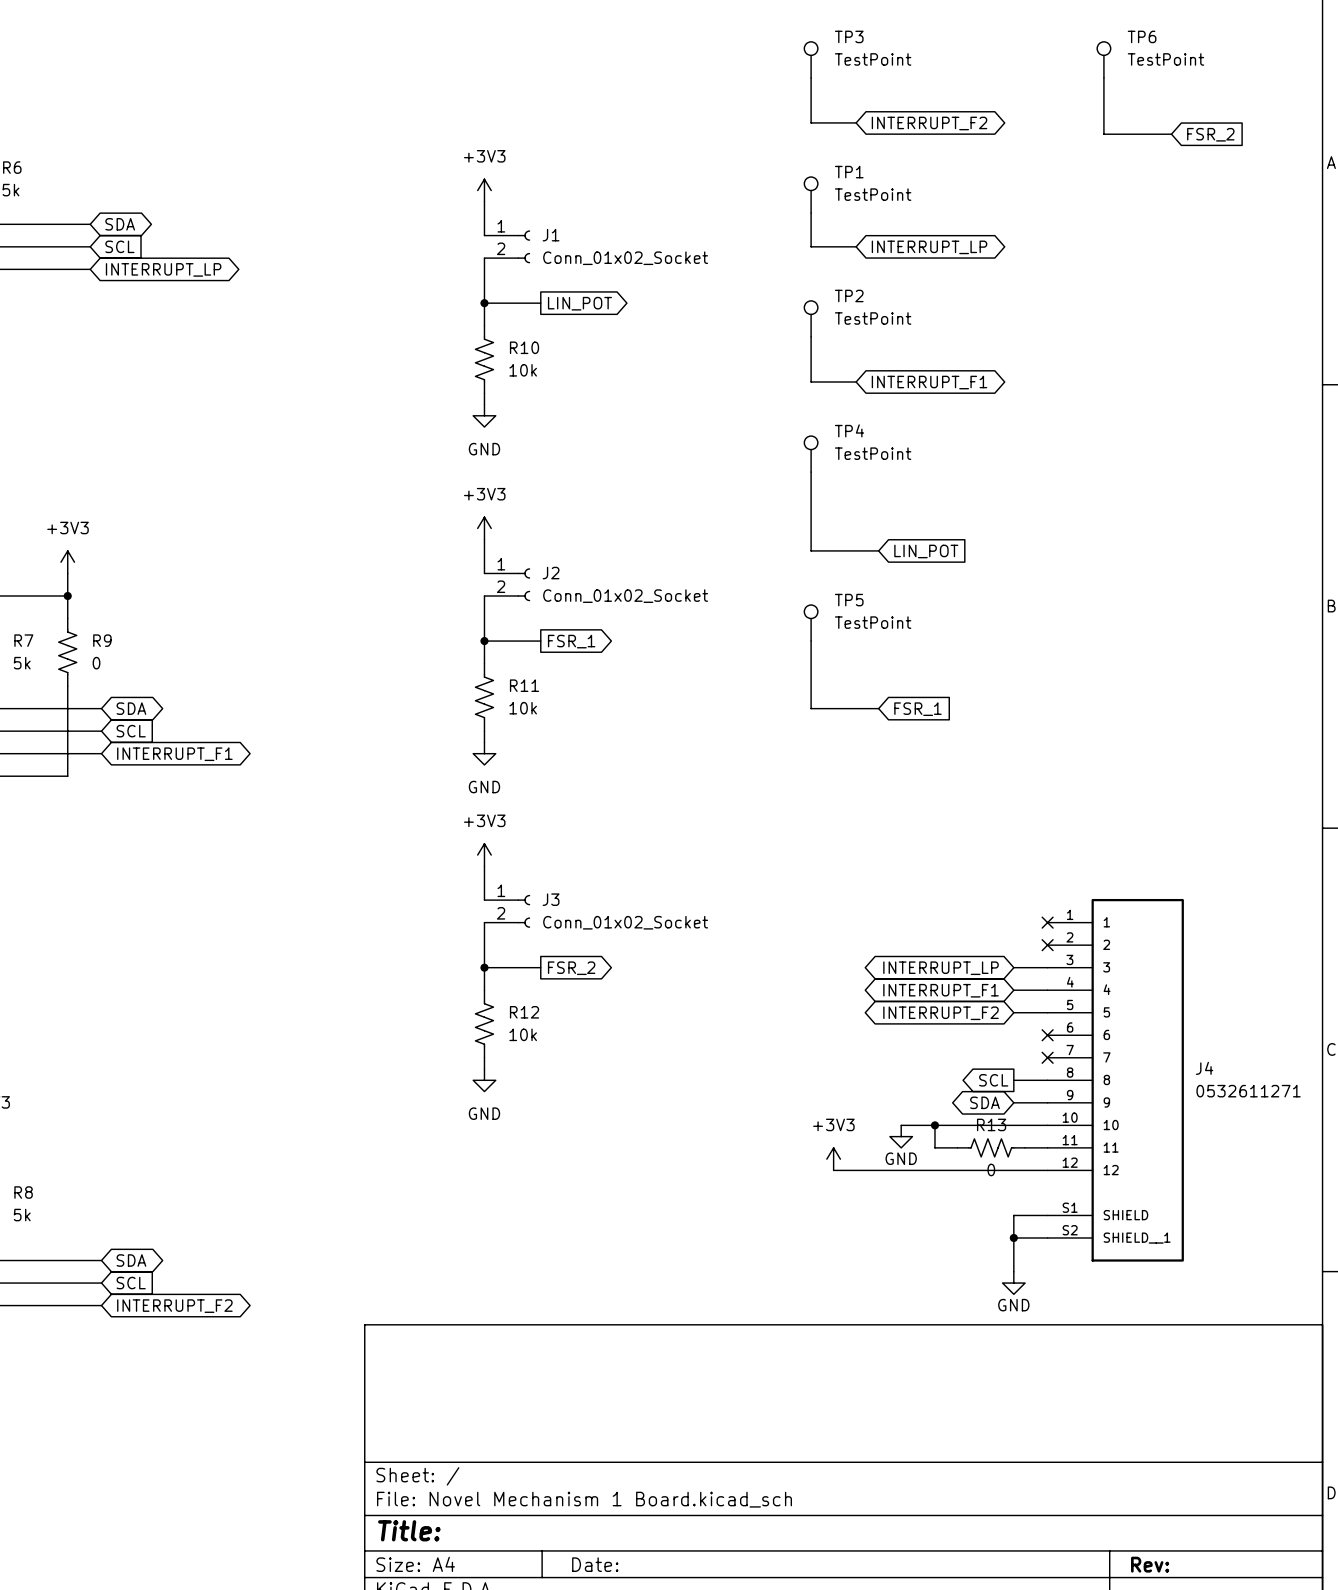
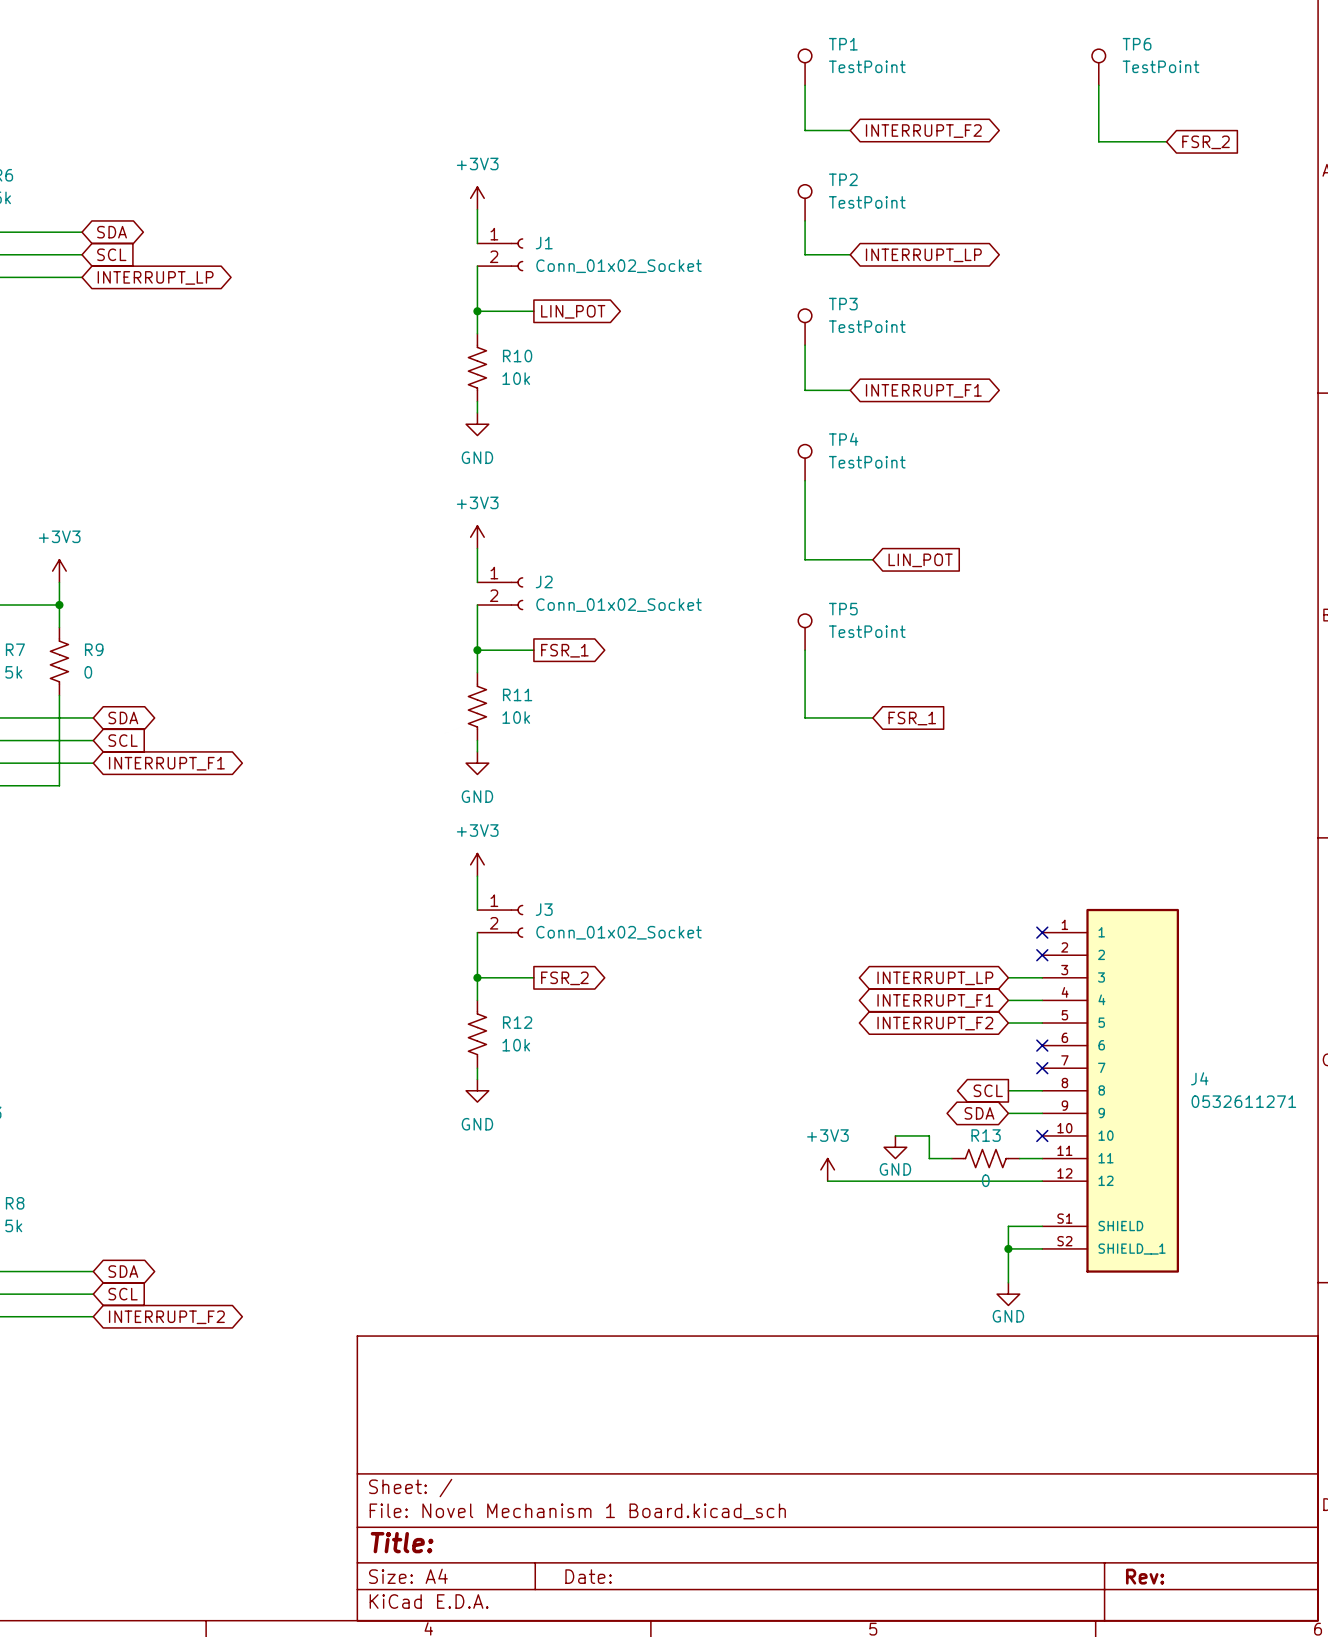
TP3 name: TP3 (849, 36) -> TP1 (843, 44)
TP1 name: TP1 (849, 172) -> TP2 (843, 179)
TP2 name: TP2 (849, 295) -> TP3 (843, 304)
wire: (934, 1125) (1047, 1125) -> none
junction: (934, 1125) -> none
no-connect mark: none -> (1042, 1135)

